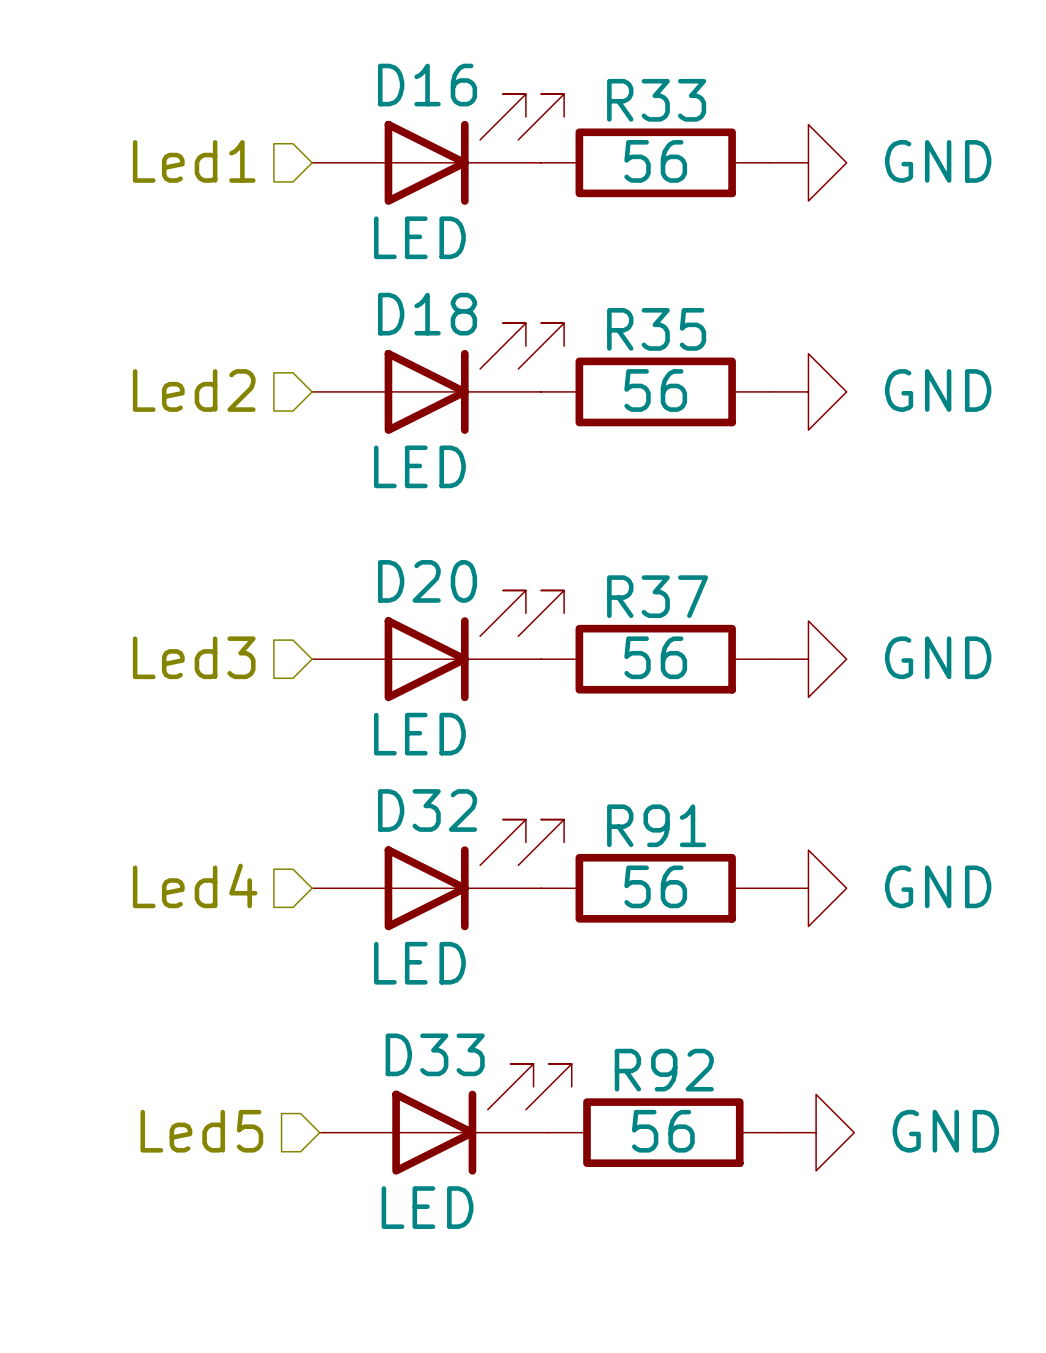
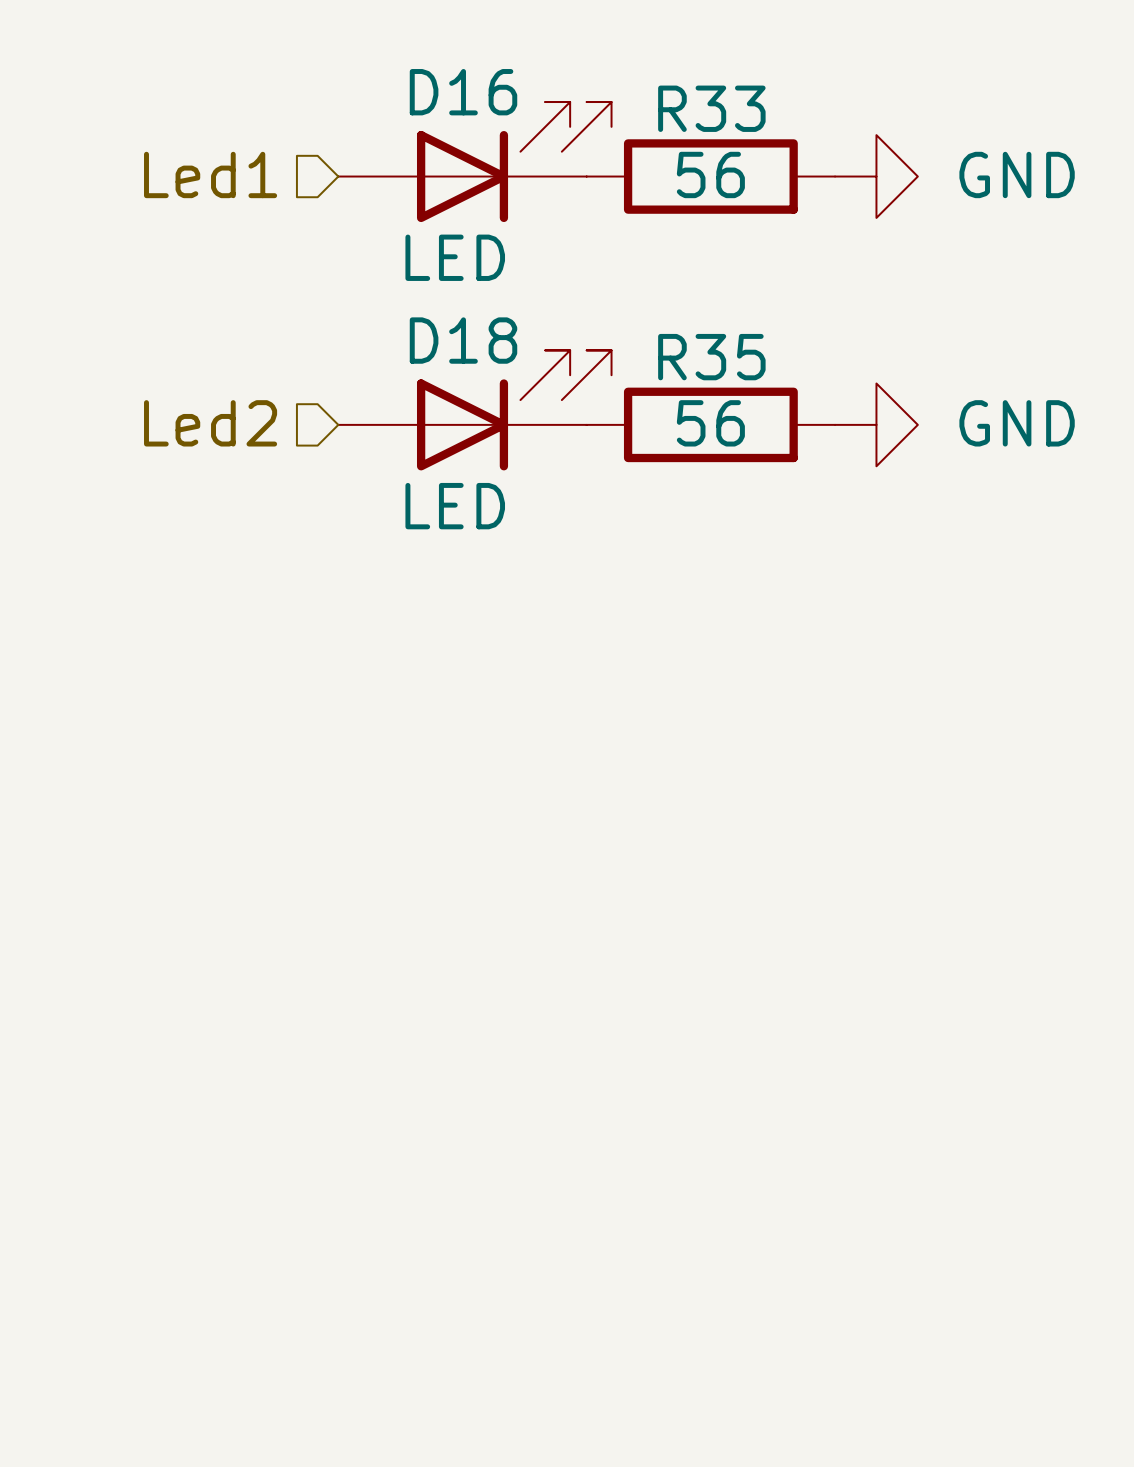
D20: LED (438, 645) -> none
hierarchical label: Led3 (194, 657) -> none
R37: 56 (655, 659) -> none
power symbol: GND (808, 659) -> none
D32: LED (438, 874) -> none
hierarchical label: Led4 (195, 885) -> none
R91: 56 (655, 888) -> none
power symbol: GND (808, 888) -> none
D33: LED (445, 1119) -> none
hierarchical label: Led5 (201, 1131) -> none
R92: 56 (663, 1132) -> none
power symbol: GND (816, 1132) -> none

